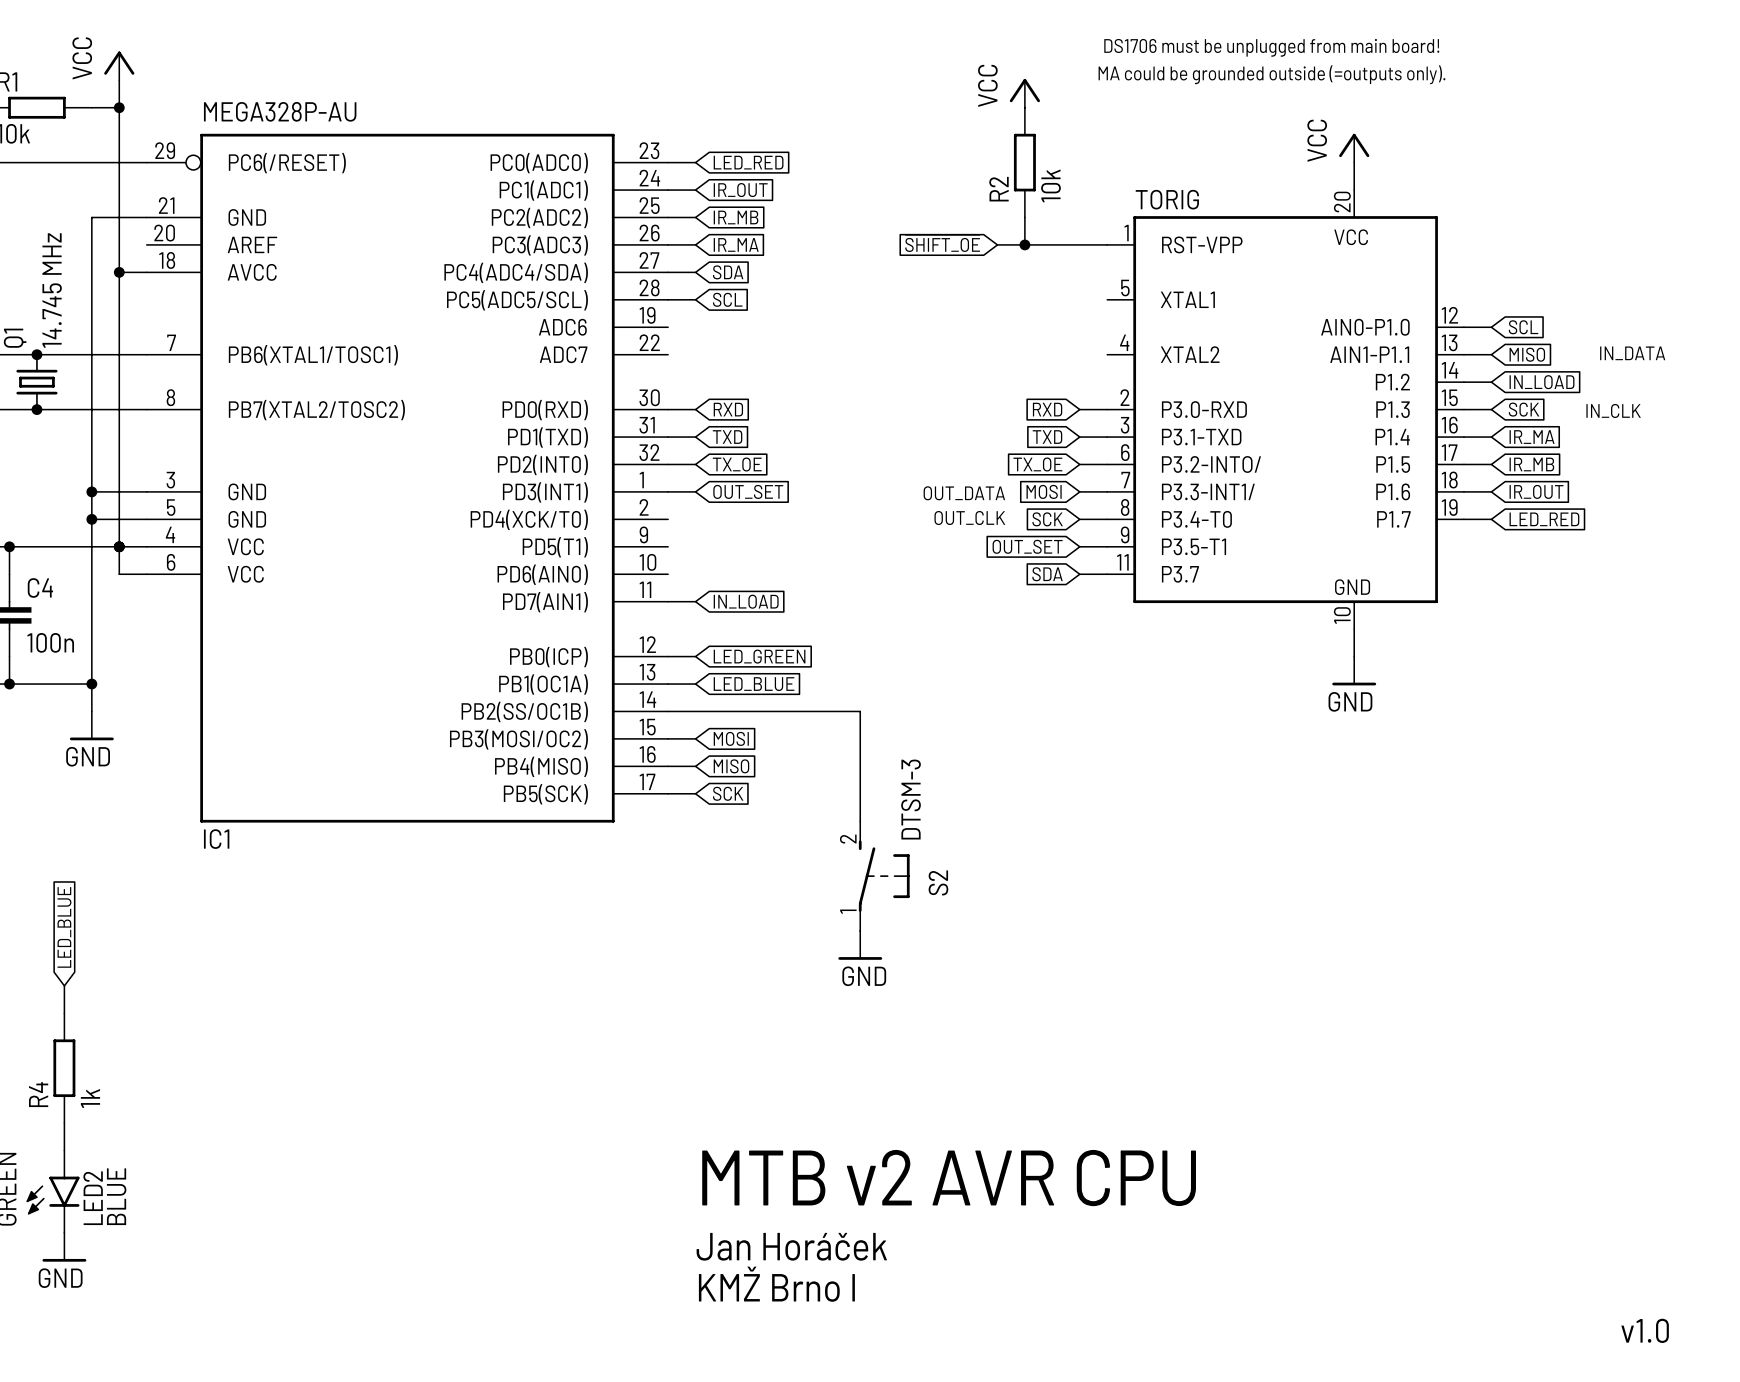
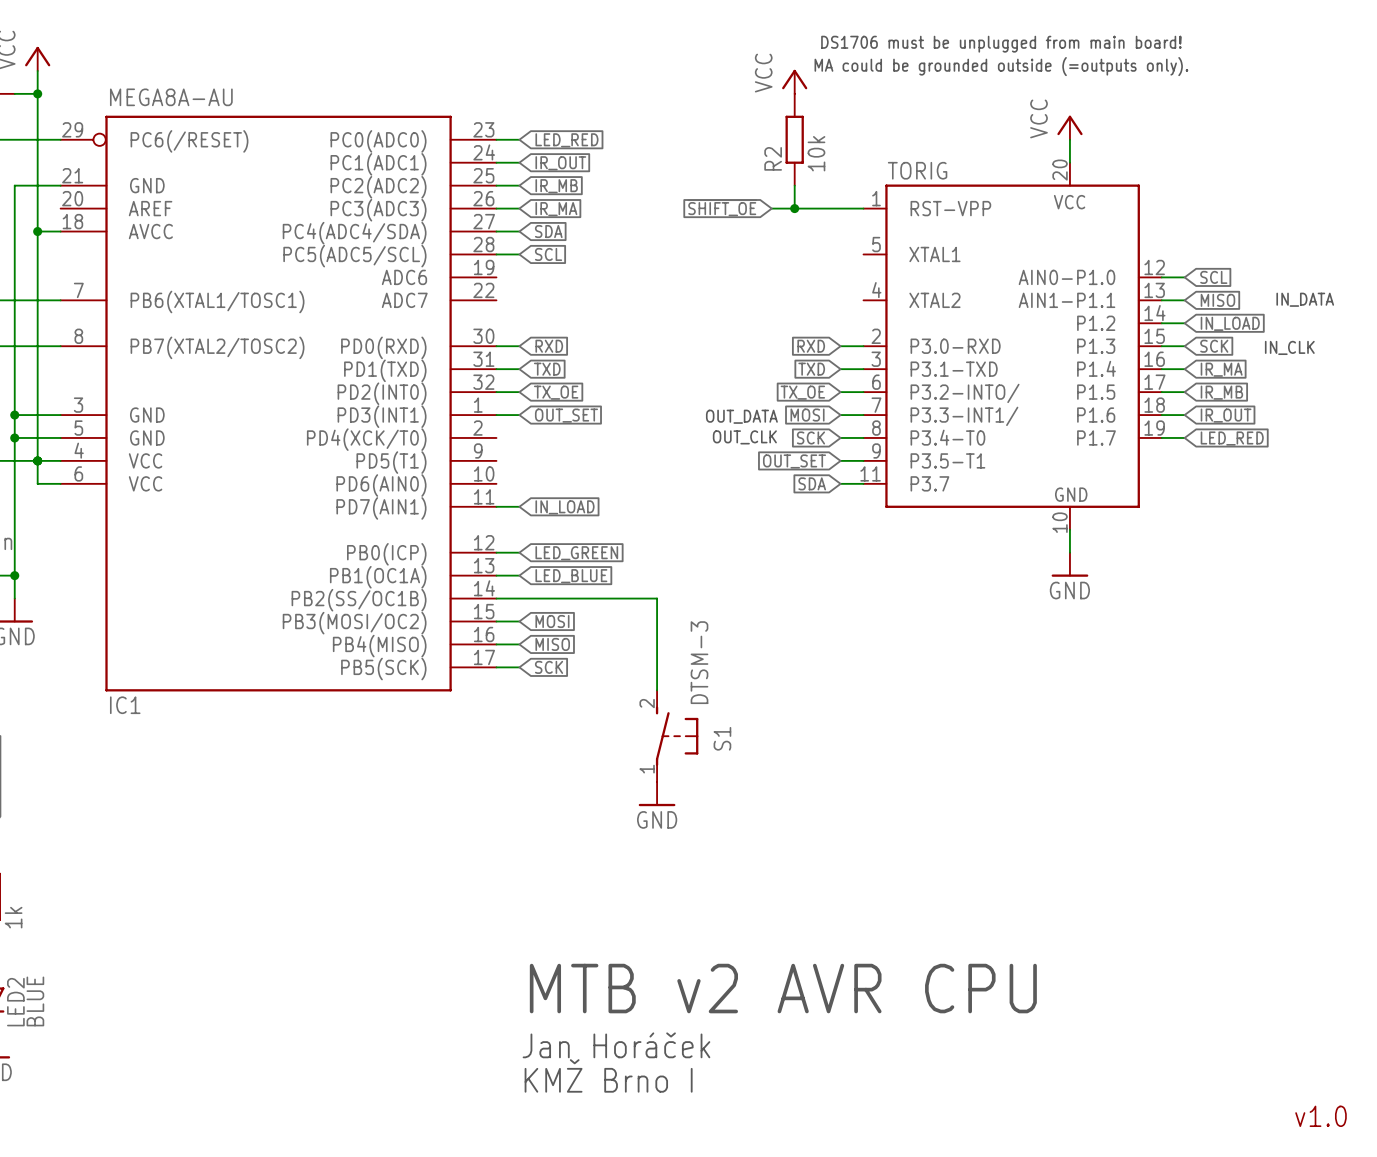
IC1 value: MEGA328P-AU (280, 111) -> MEGA8A-AU (171, 97)
S2 name: S2 (938, 882) -> S1 (722, 738)

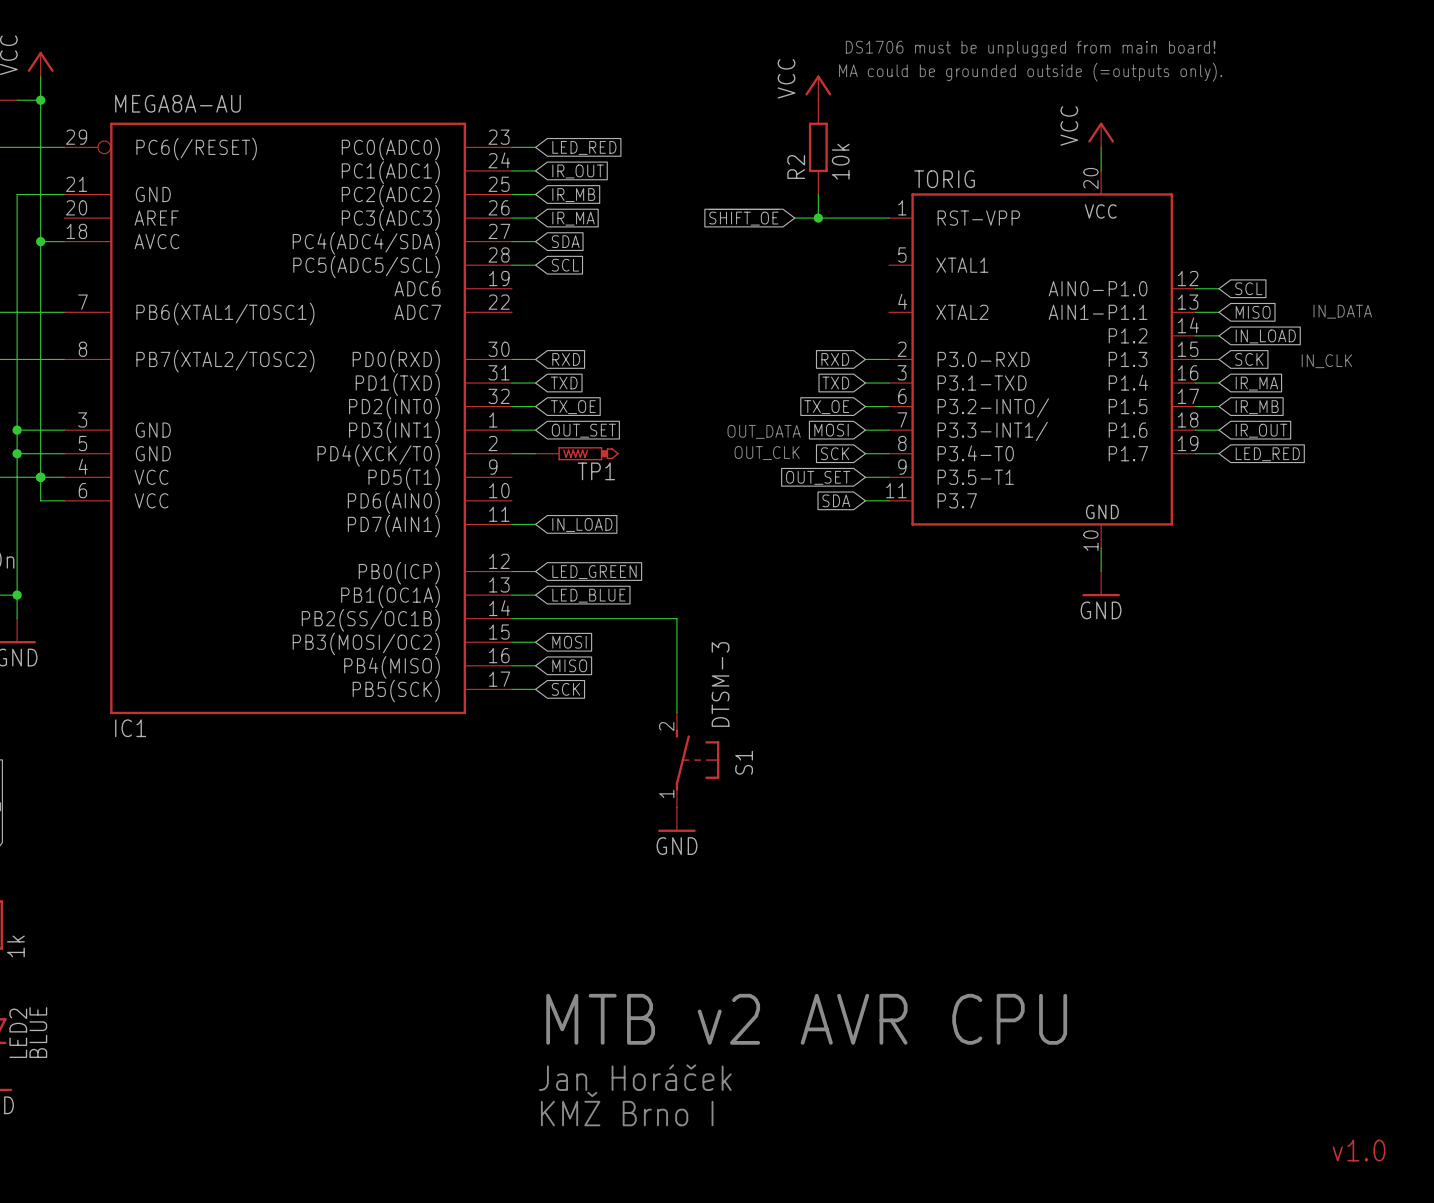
wire: none -> (511, 453) (535, 453)
TP1: none -> (577, 453)

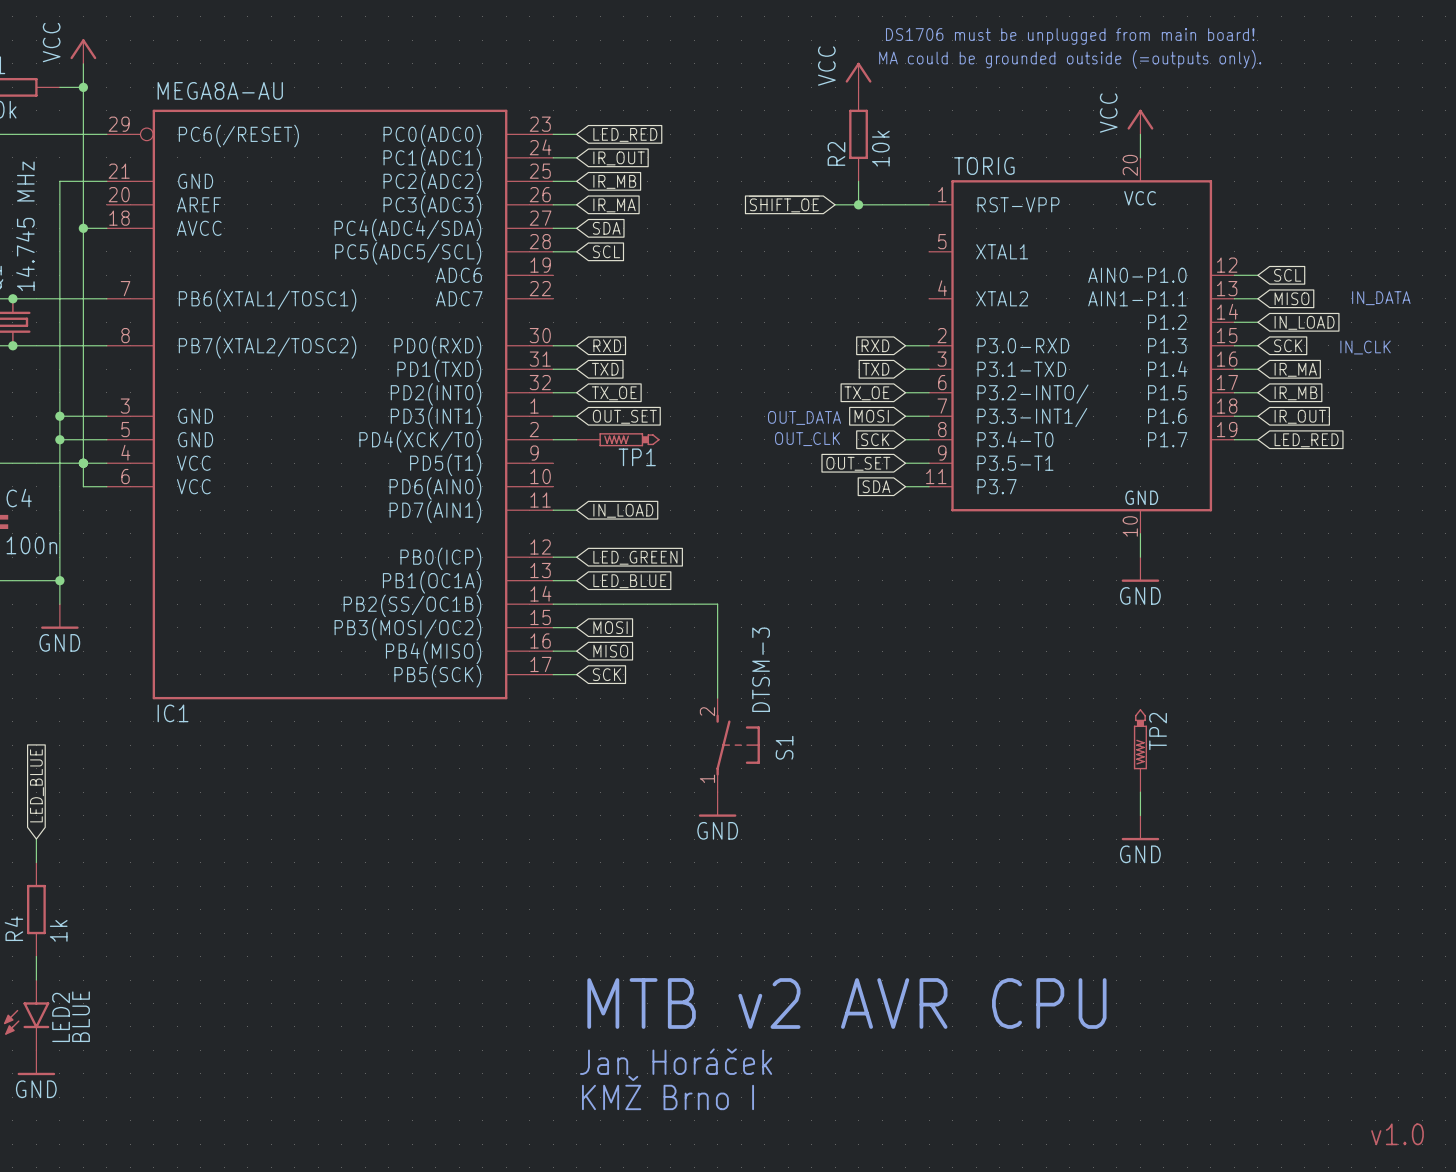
TP2: none -> (1140, 750)
wire: none -> (1140, 792) (1140, 815)
power symbol: none -> GND (1140, 827)

